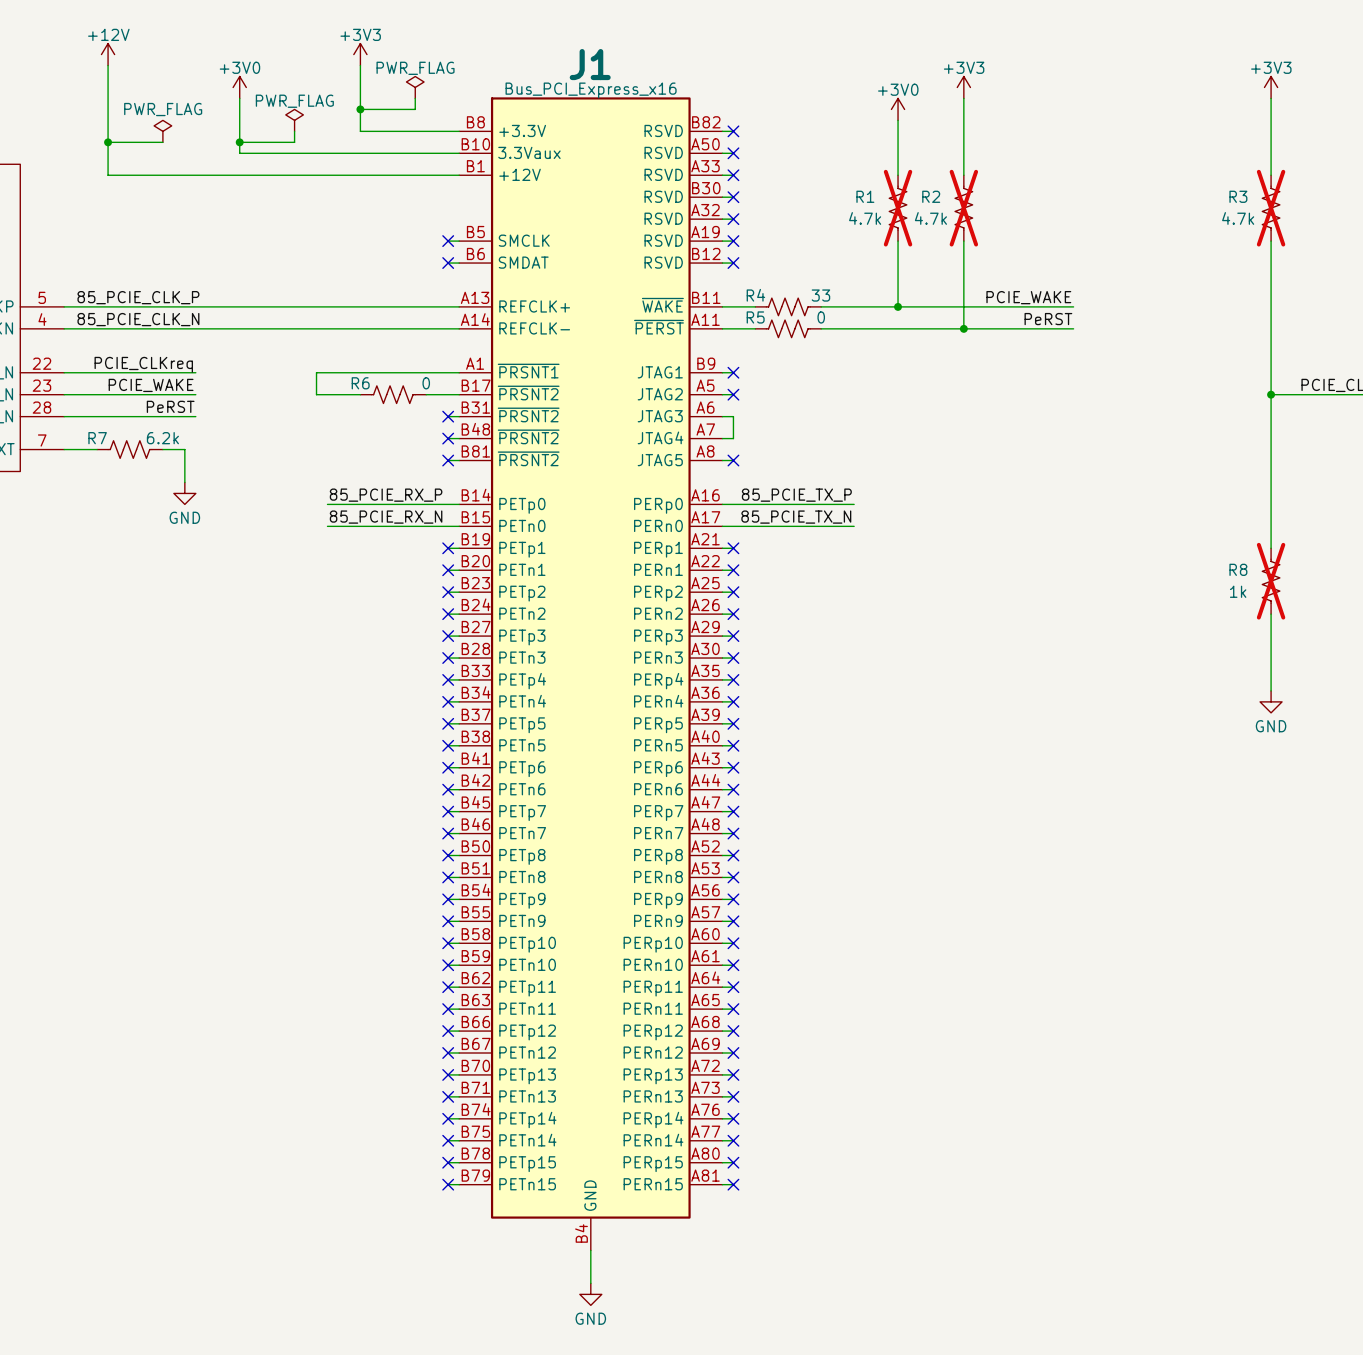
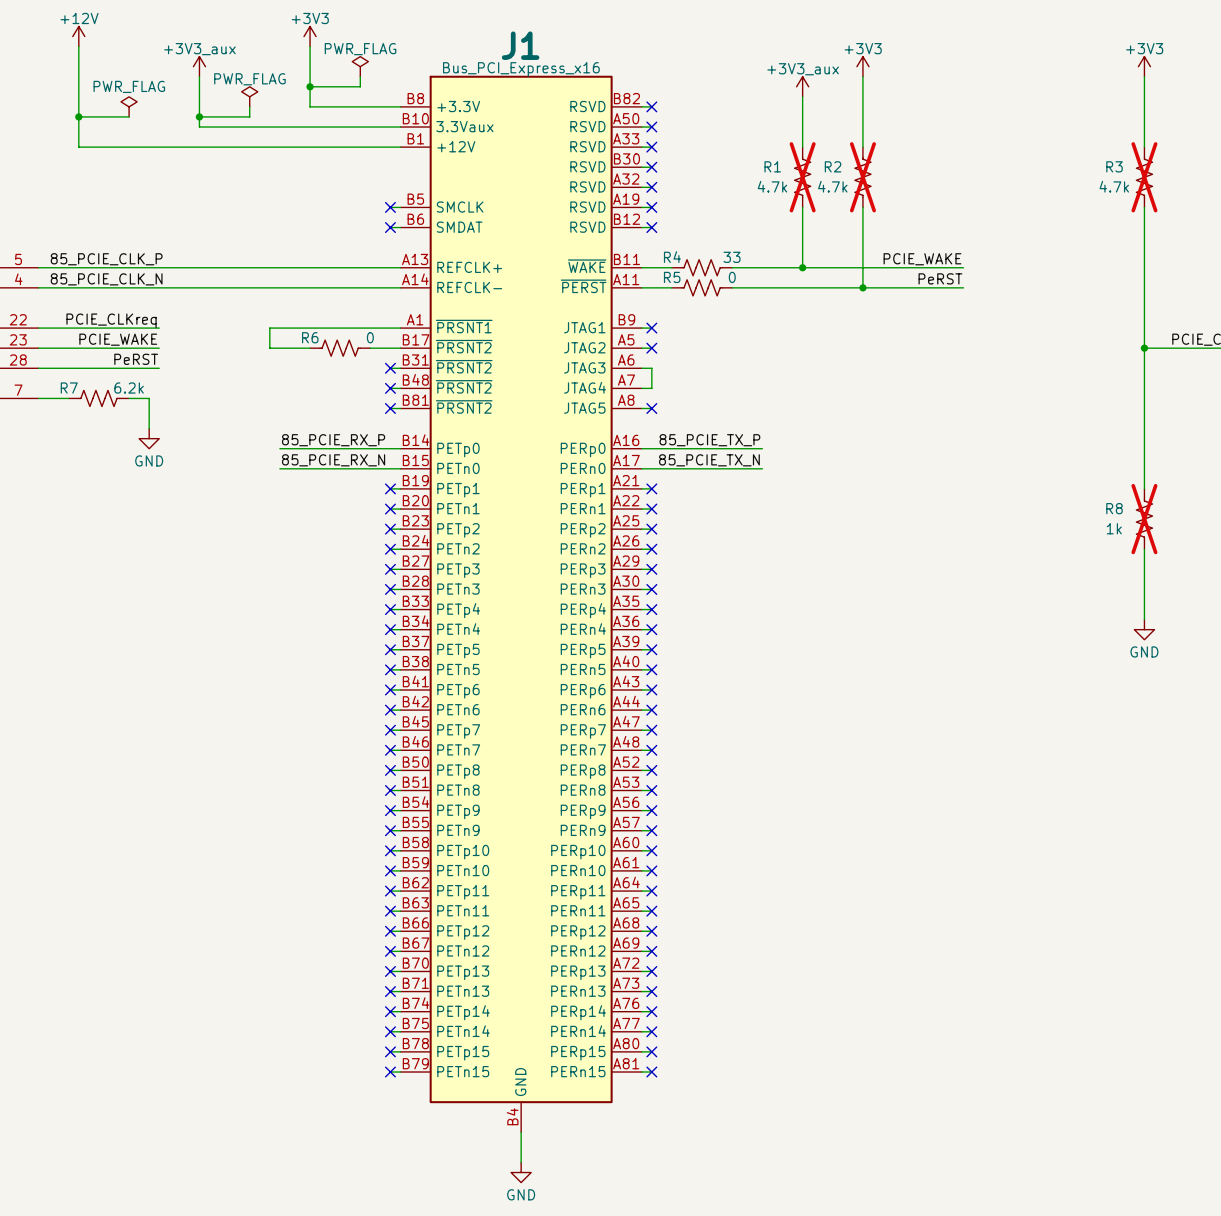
power symbol: +3V0 (239, 87) -> +3V3_aux (199, 66)
power symbol: +3V0 (898, 109) -> +3V3_aux (802, 86)

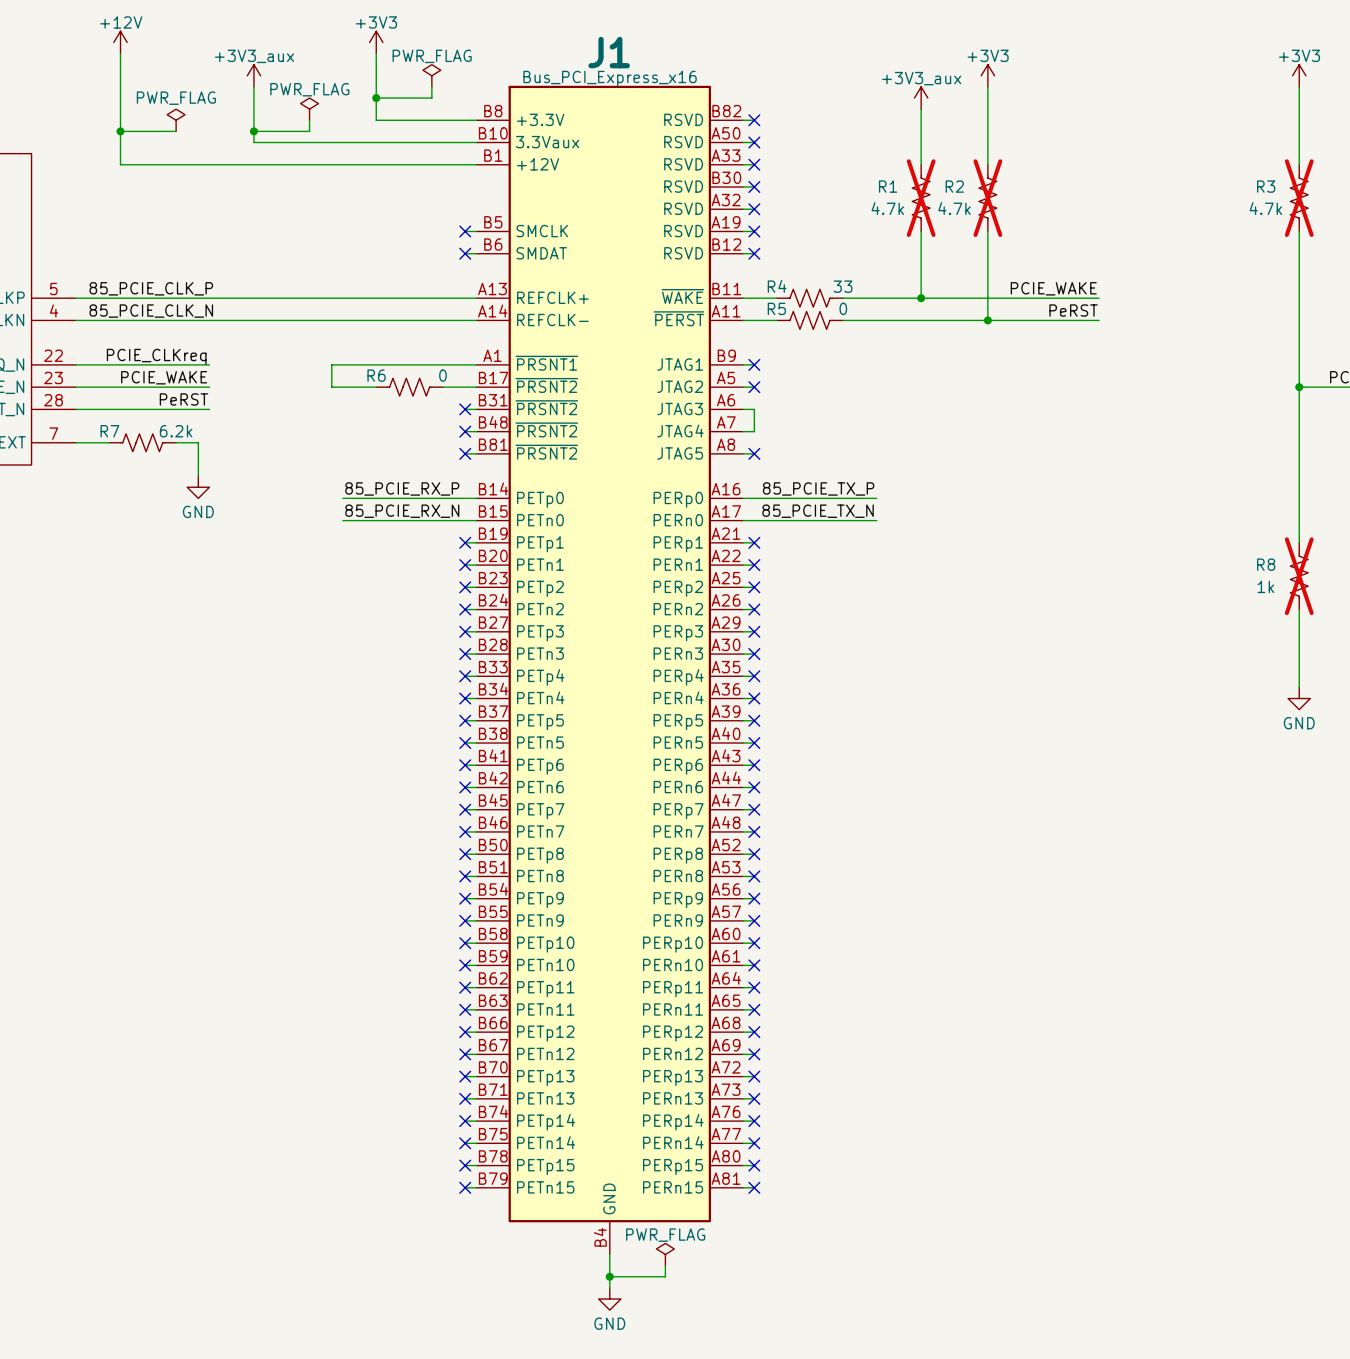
power symbol: none -> PWR_FLAG (665, 1254)
wire: none -> (665, 1265) (665, 1276) (609, 1276)
junction: none -> (609, 1276)

